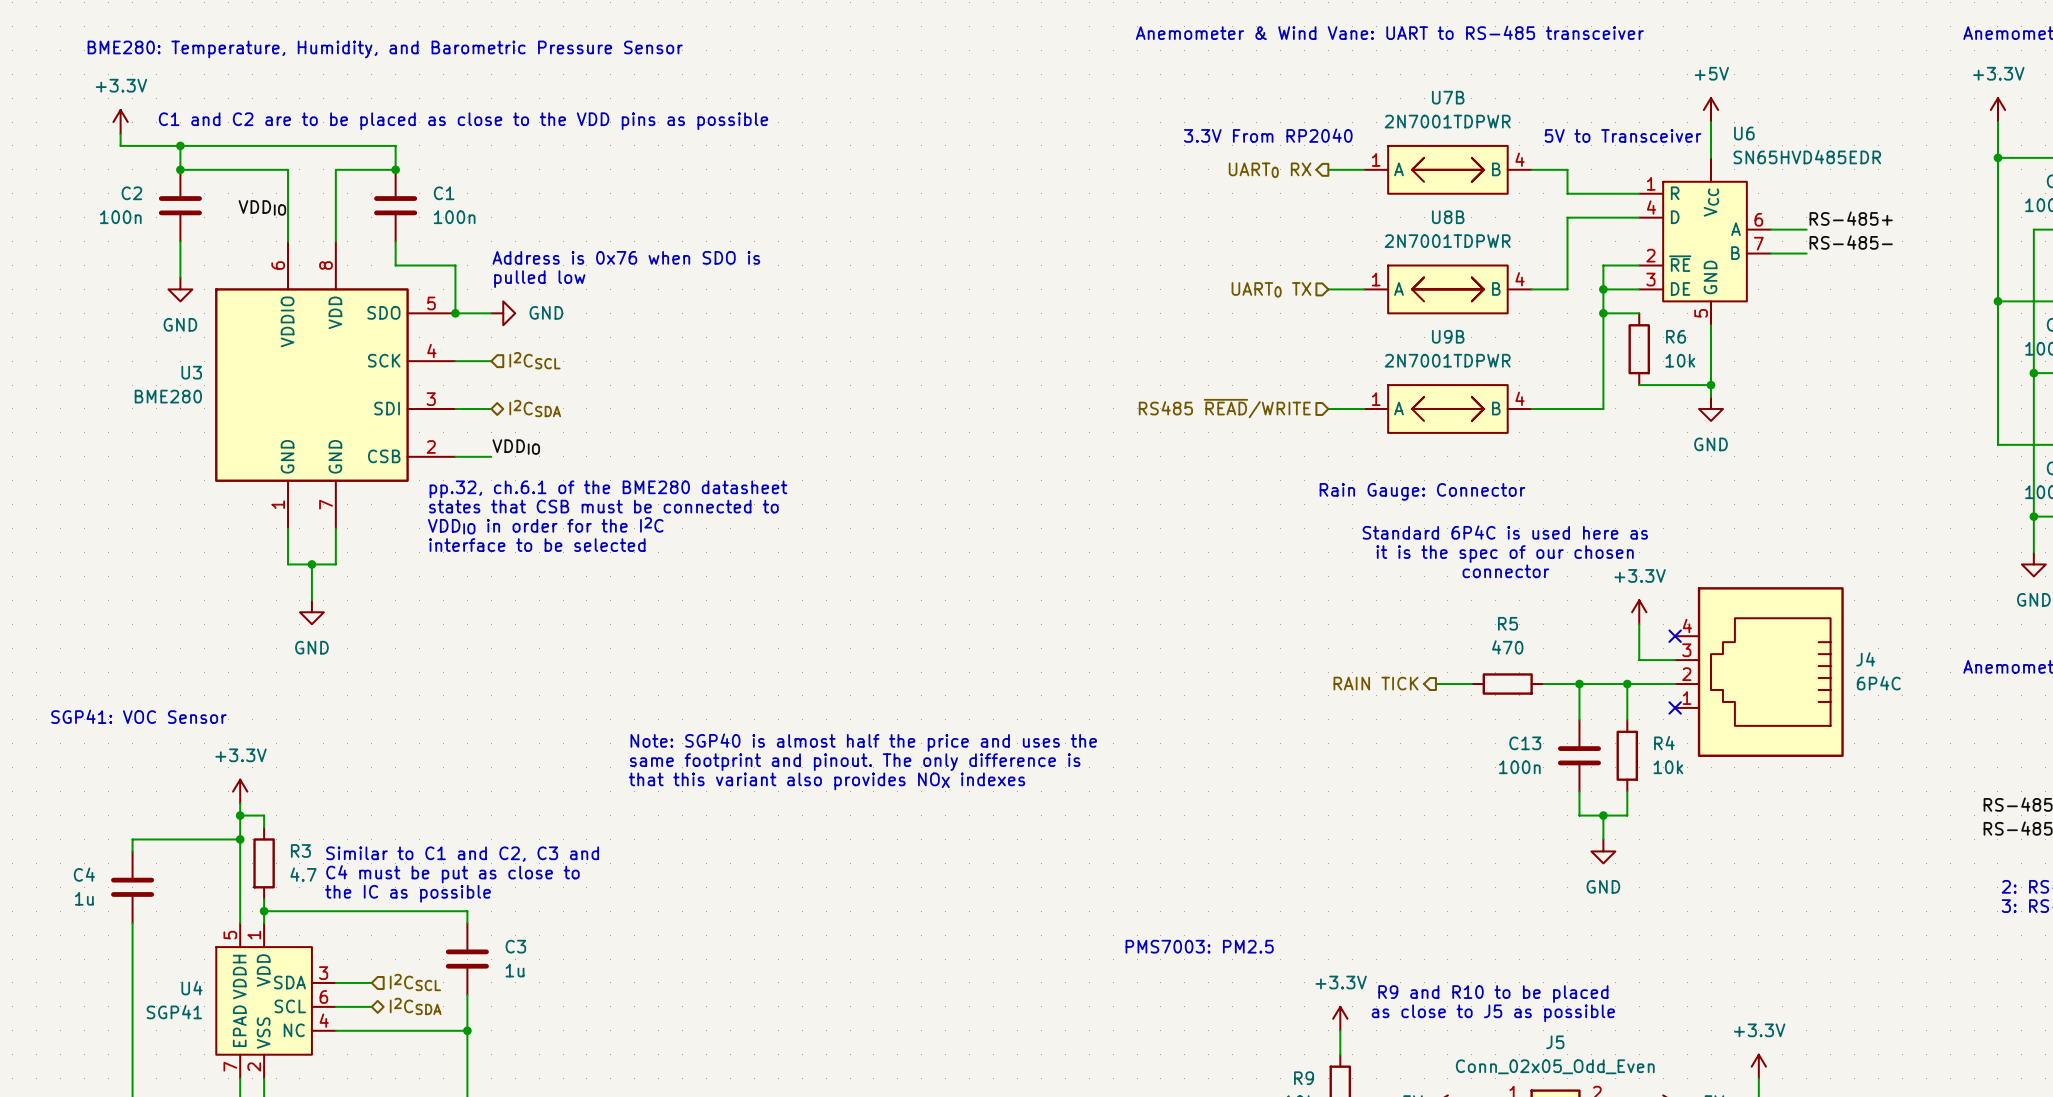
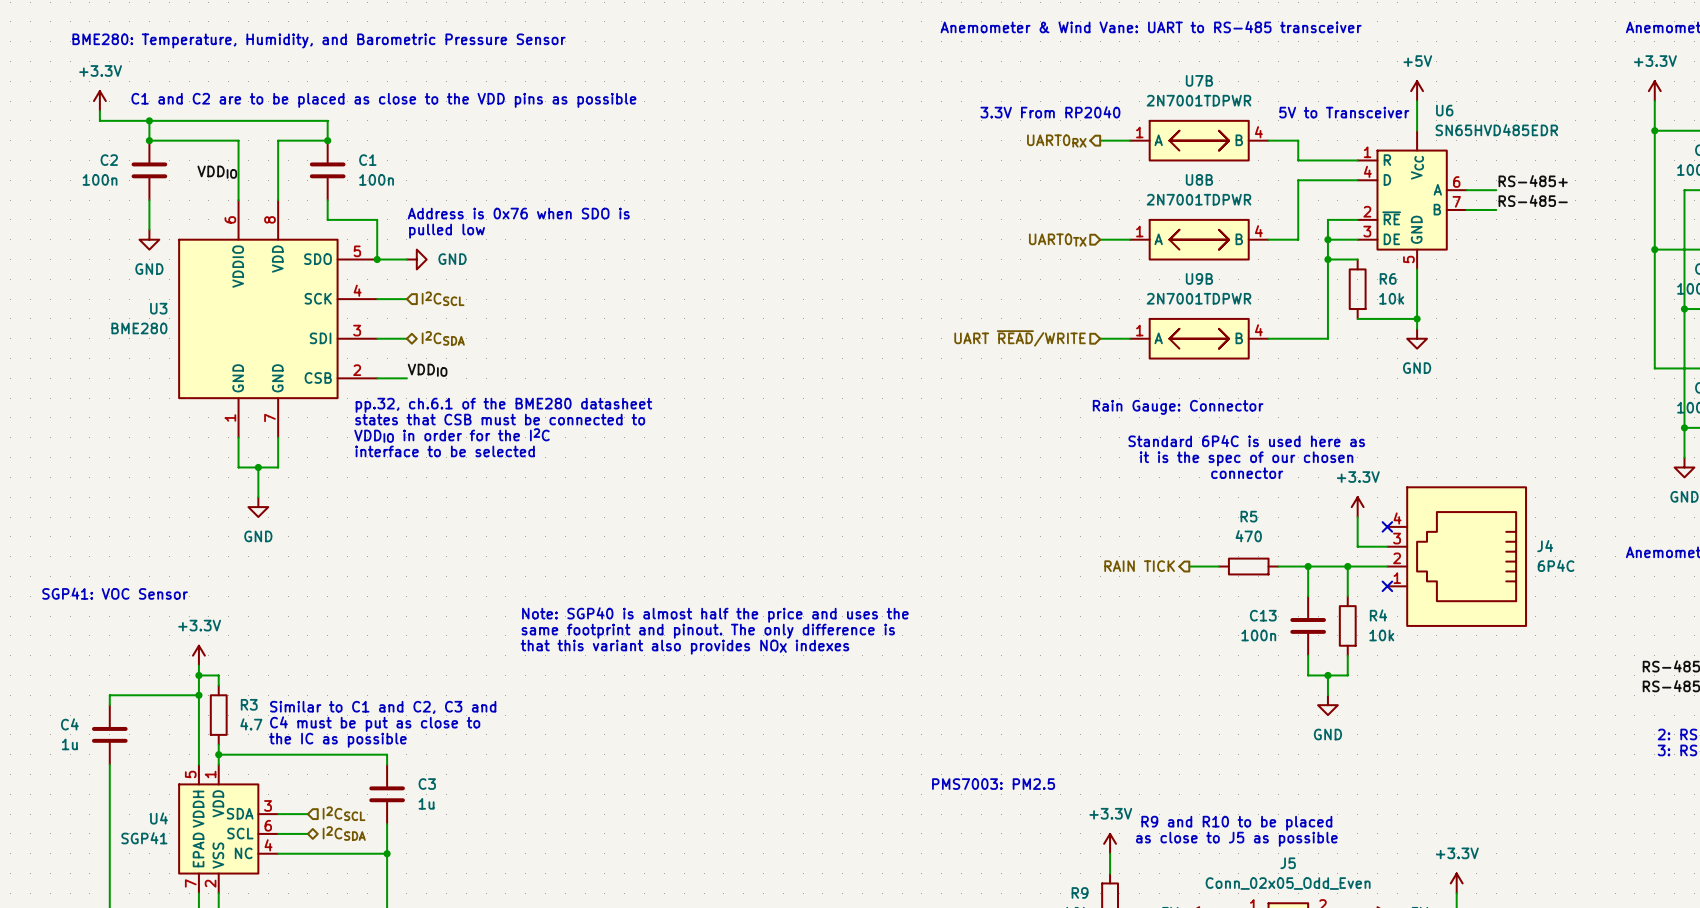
hierarchical label: UART0 RX (1270, 170) -> UART0RX (1056, 141)
hierarchical label: UART0 TX (1271, 289) -> UART0TX (1057, 240)
hierarchical label: RS485 ~{READ}/WRITE (1224, 408) -> UART ~{READ}/WRITE (1020, 338)

